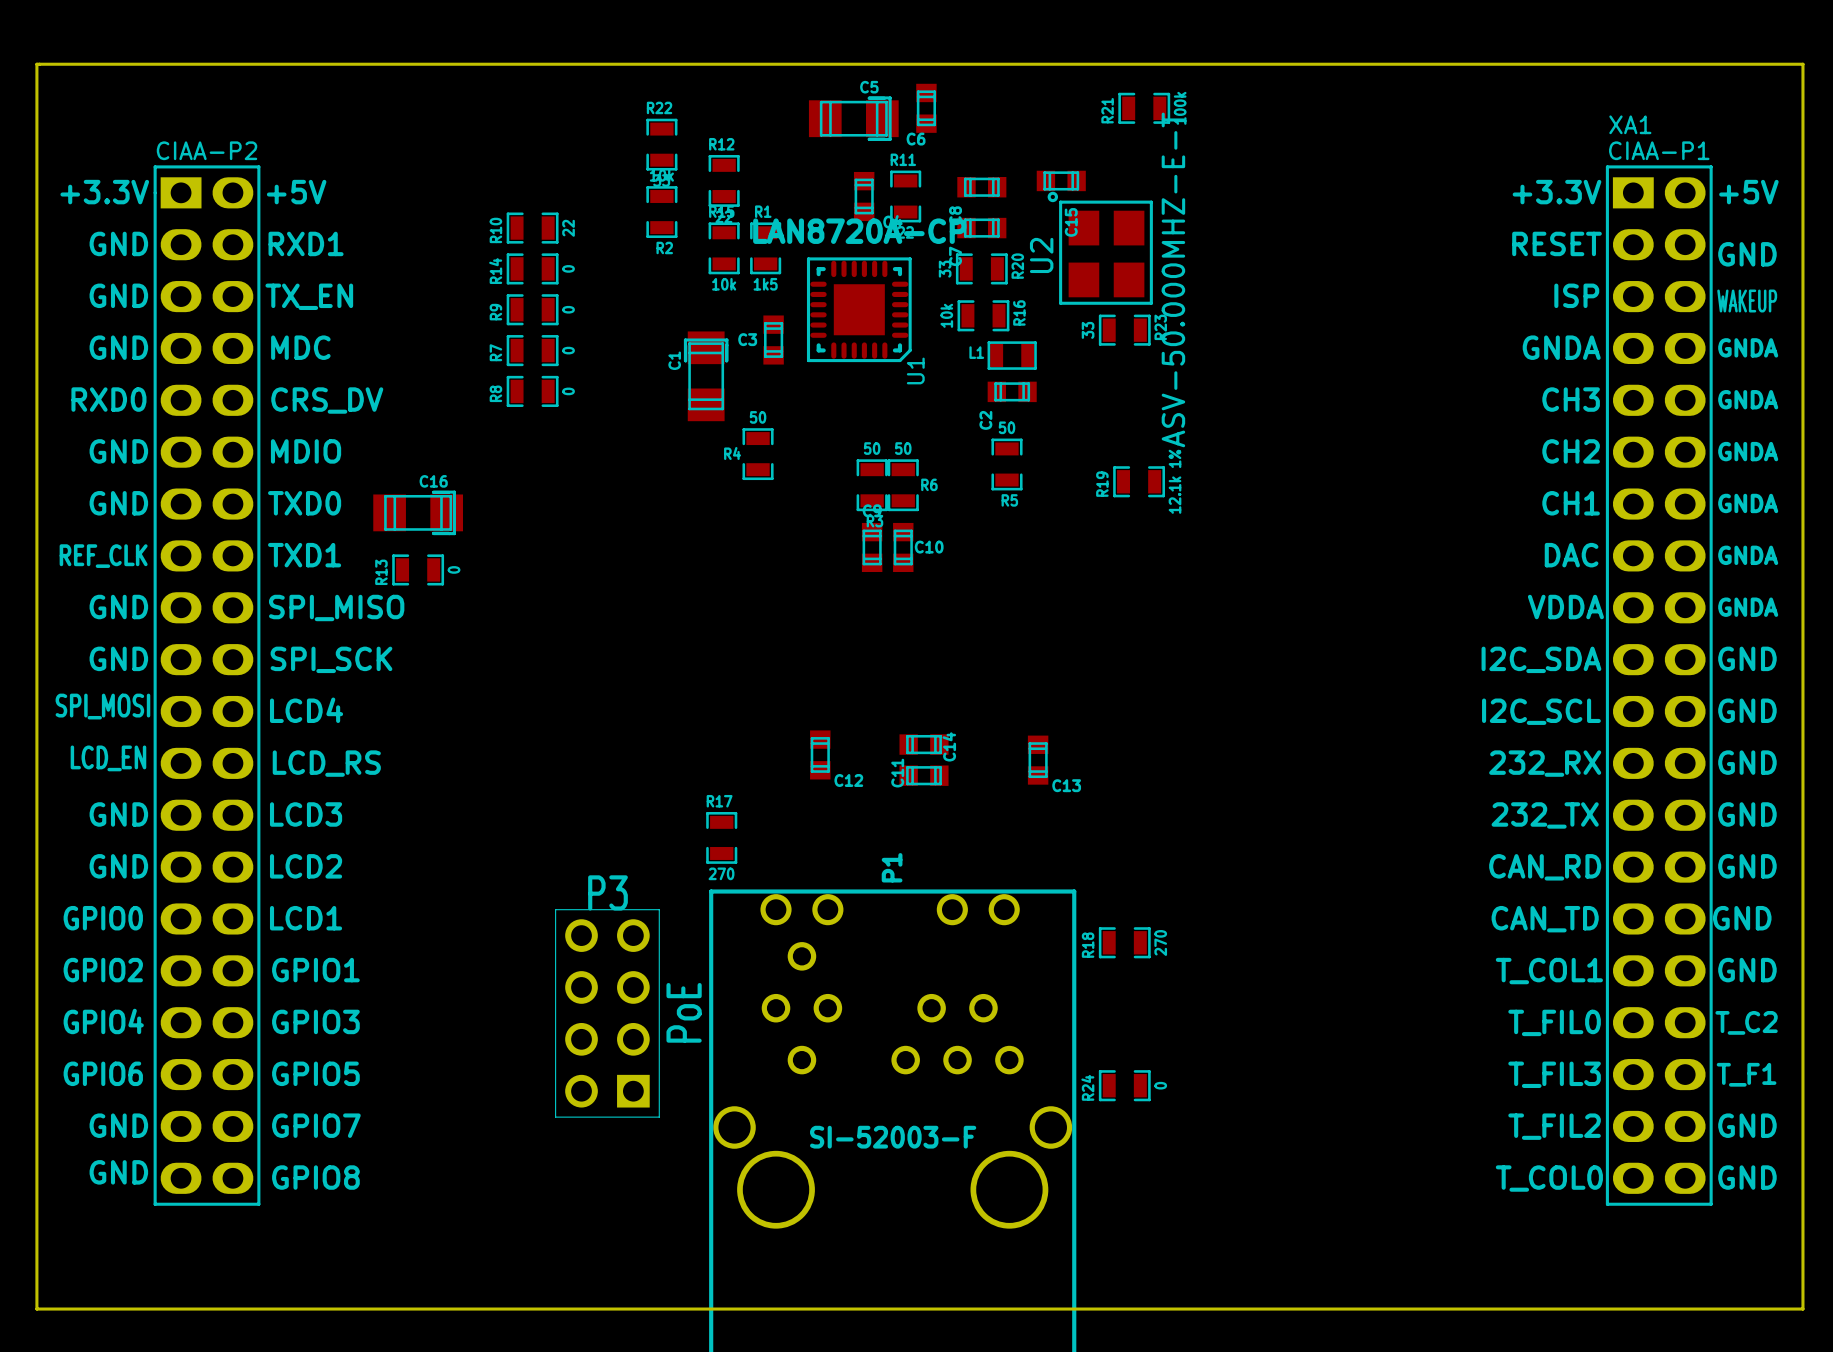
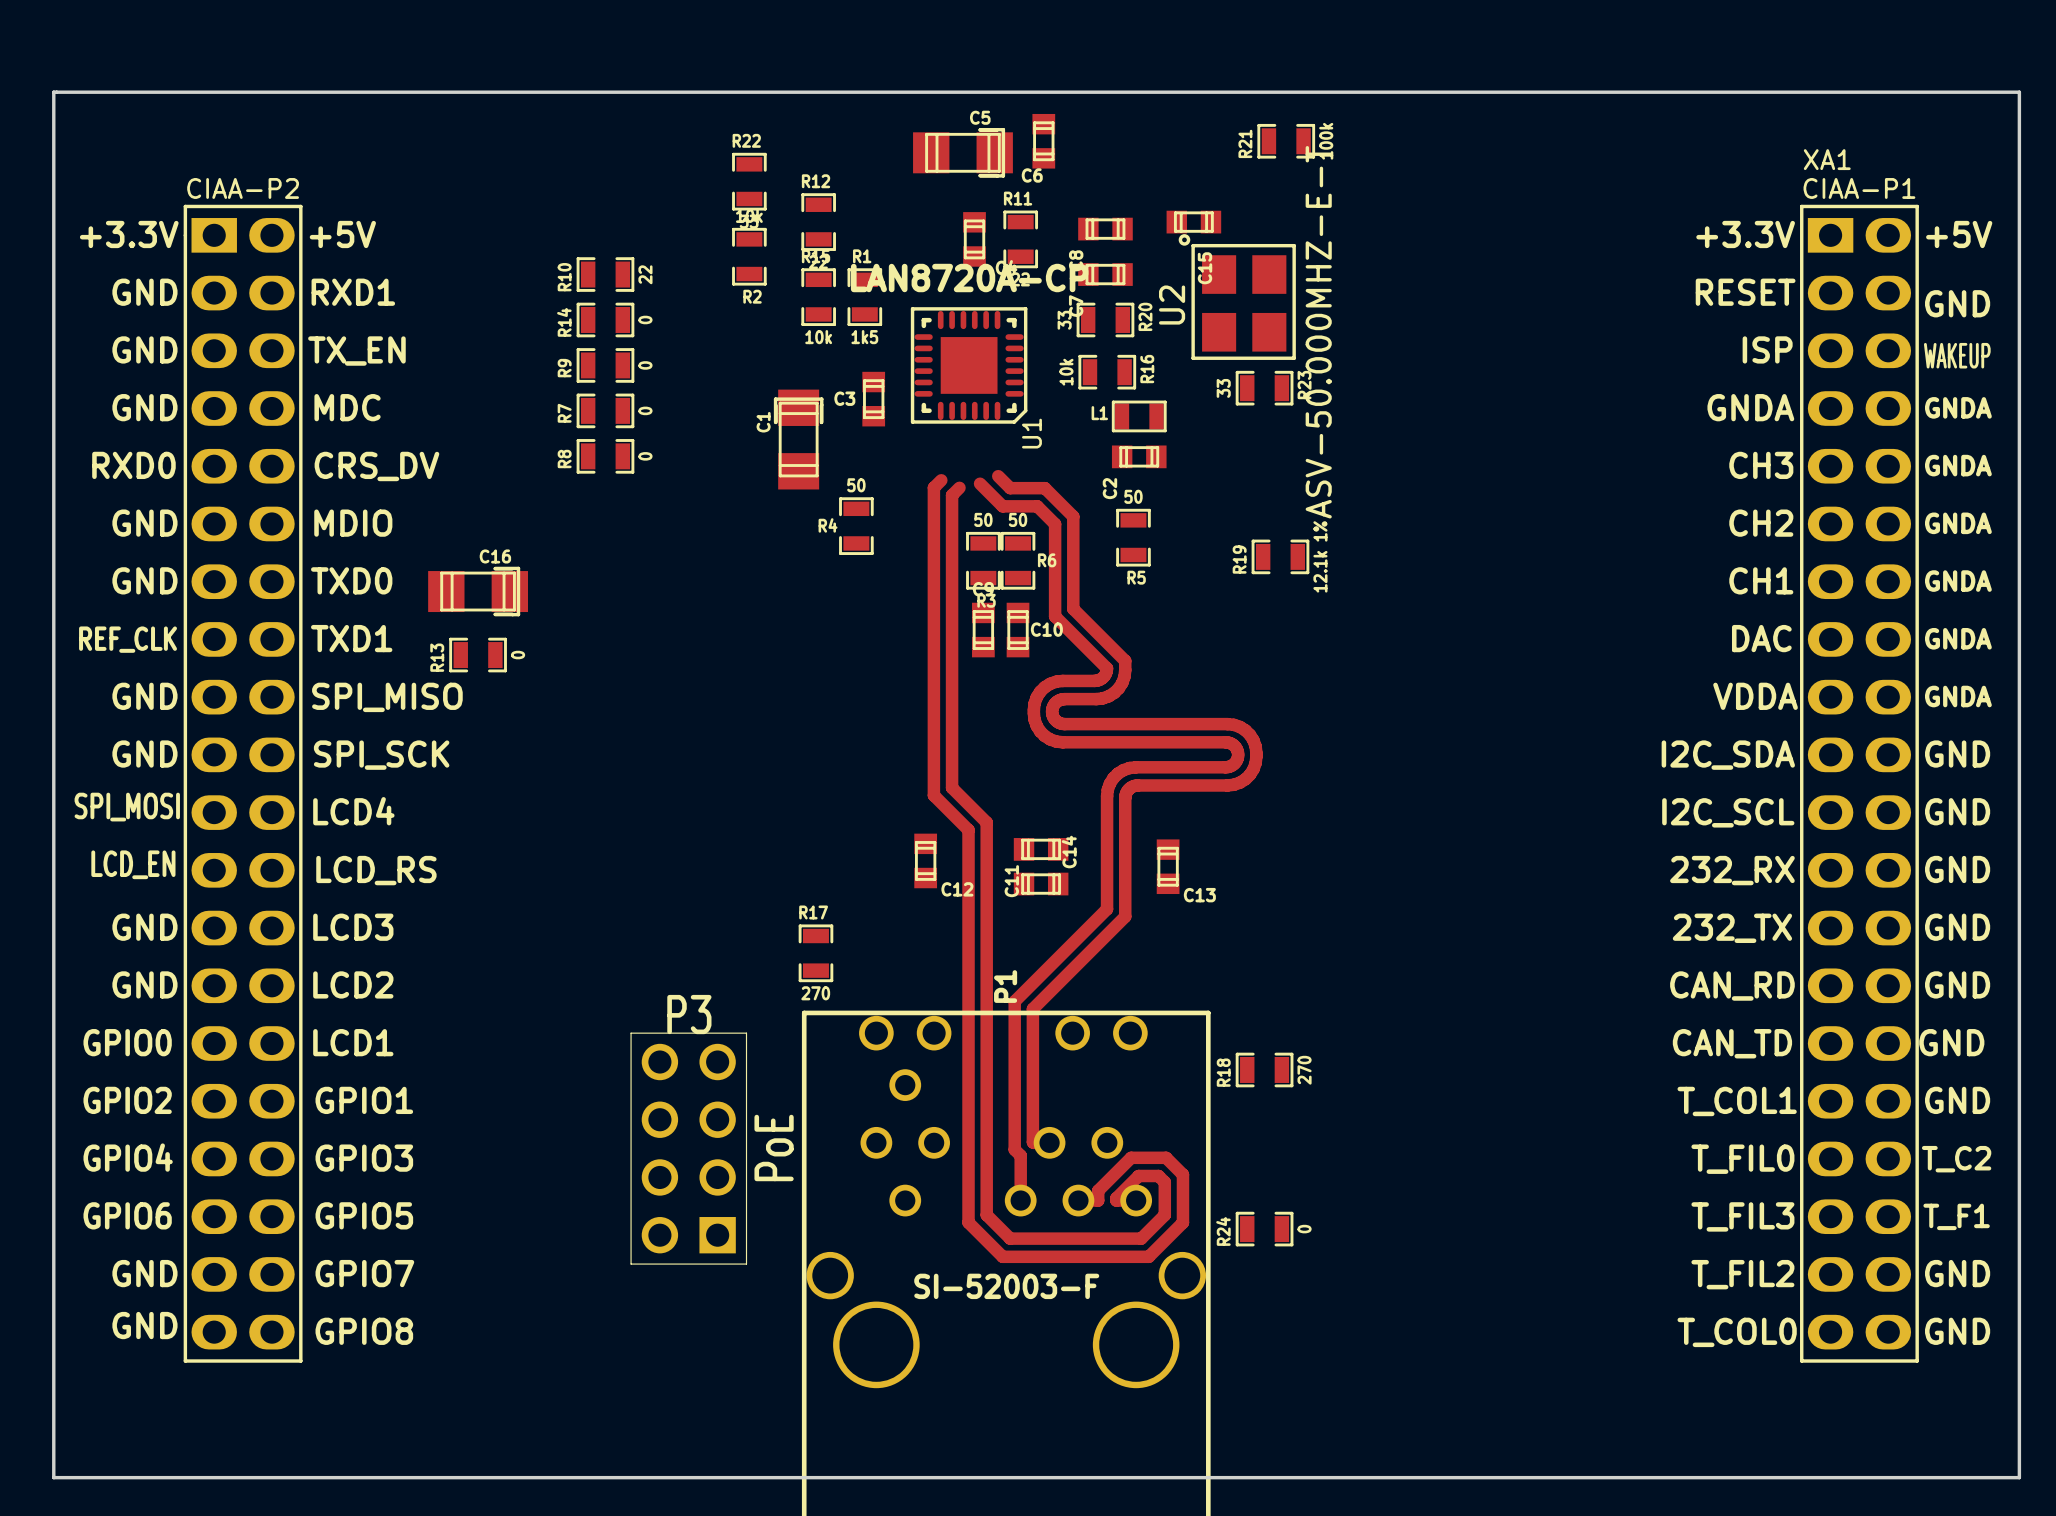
track: none -> (998, 476) (1010, 488) (1044, 488) (1073, 516) (1073, 608) (1125, 660) (1124, 676) (1114, 692) (1102, 698) (1059, 700) (1052, 708) (1054, 719) (1064, 724) (1233, 724) (1250, 735) (1256, 753) (1255, 763) (1250, 774) (1233, 784) (1137, 785) (1129, 788) (1126, 792) (1125, 916) (1032, 1009) (1032, 1142) (1049, 1142)
track: none -> (941, 480) (933, 487) (933, 795) (968, 830) (968, 1222) (1002, 1256) (1148, 1256) (1182, 1222) (1182, 1174) (1166, 1157) (1131, 1157) (1098, 1190) (1098, 1200) (1078, 1200)
track: none -> (980, 483) (1002, 506) (1037, 506) (1055, 524) (1055, 616) (1107, 668) (1104, 676) (1097, 680) (1056, 681) (1044, 687) (1036, 697) (1033, 709) (1034, 719) (1040, 731) (1050, 739) (1062, 742) (1228, 742) (1235, 747) (1238, 754) (1235, 762) (1228, 766) (1129, 768) (1117, 773) (1109, 783) (1107, 796) (1107, 909) (1014, 1001) (1014, 1149) (1020, 1155) (1020, 1200)
track: none -> (959, 487) (952, 495) (952, 787) (986, 822) (986, 1215) (1010, 1238) (1141, 1238) (1164, 1215) (1164, 1182) (1158, 1175) (1138, 1175) (1116, 1198) (1116, 1200) (1136, 1200)

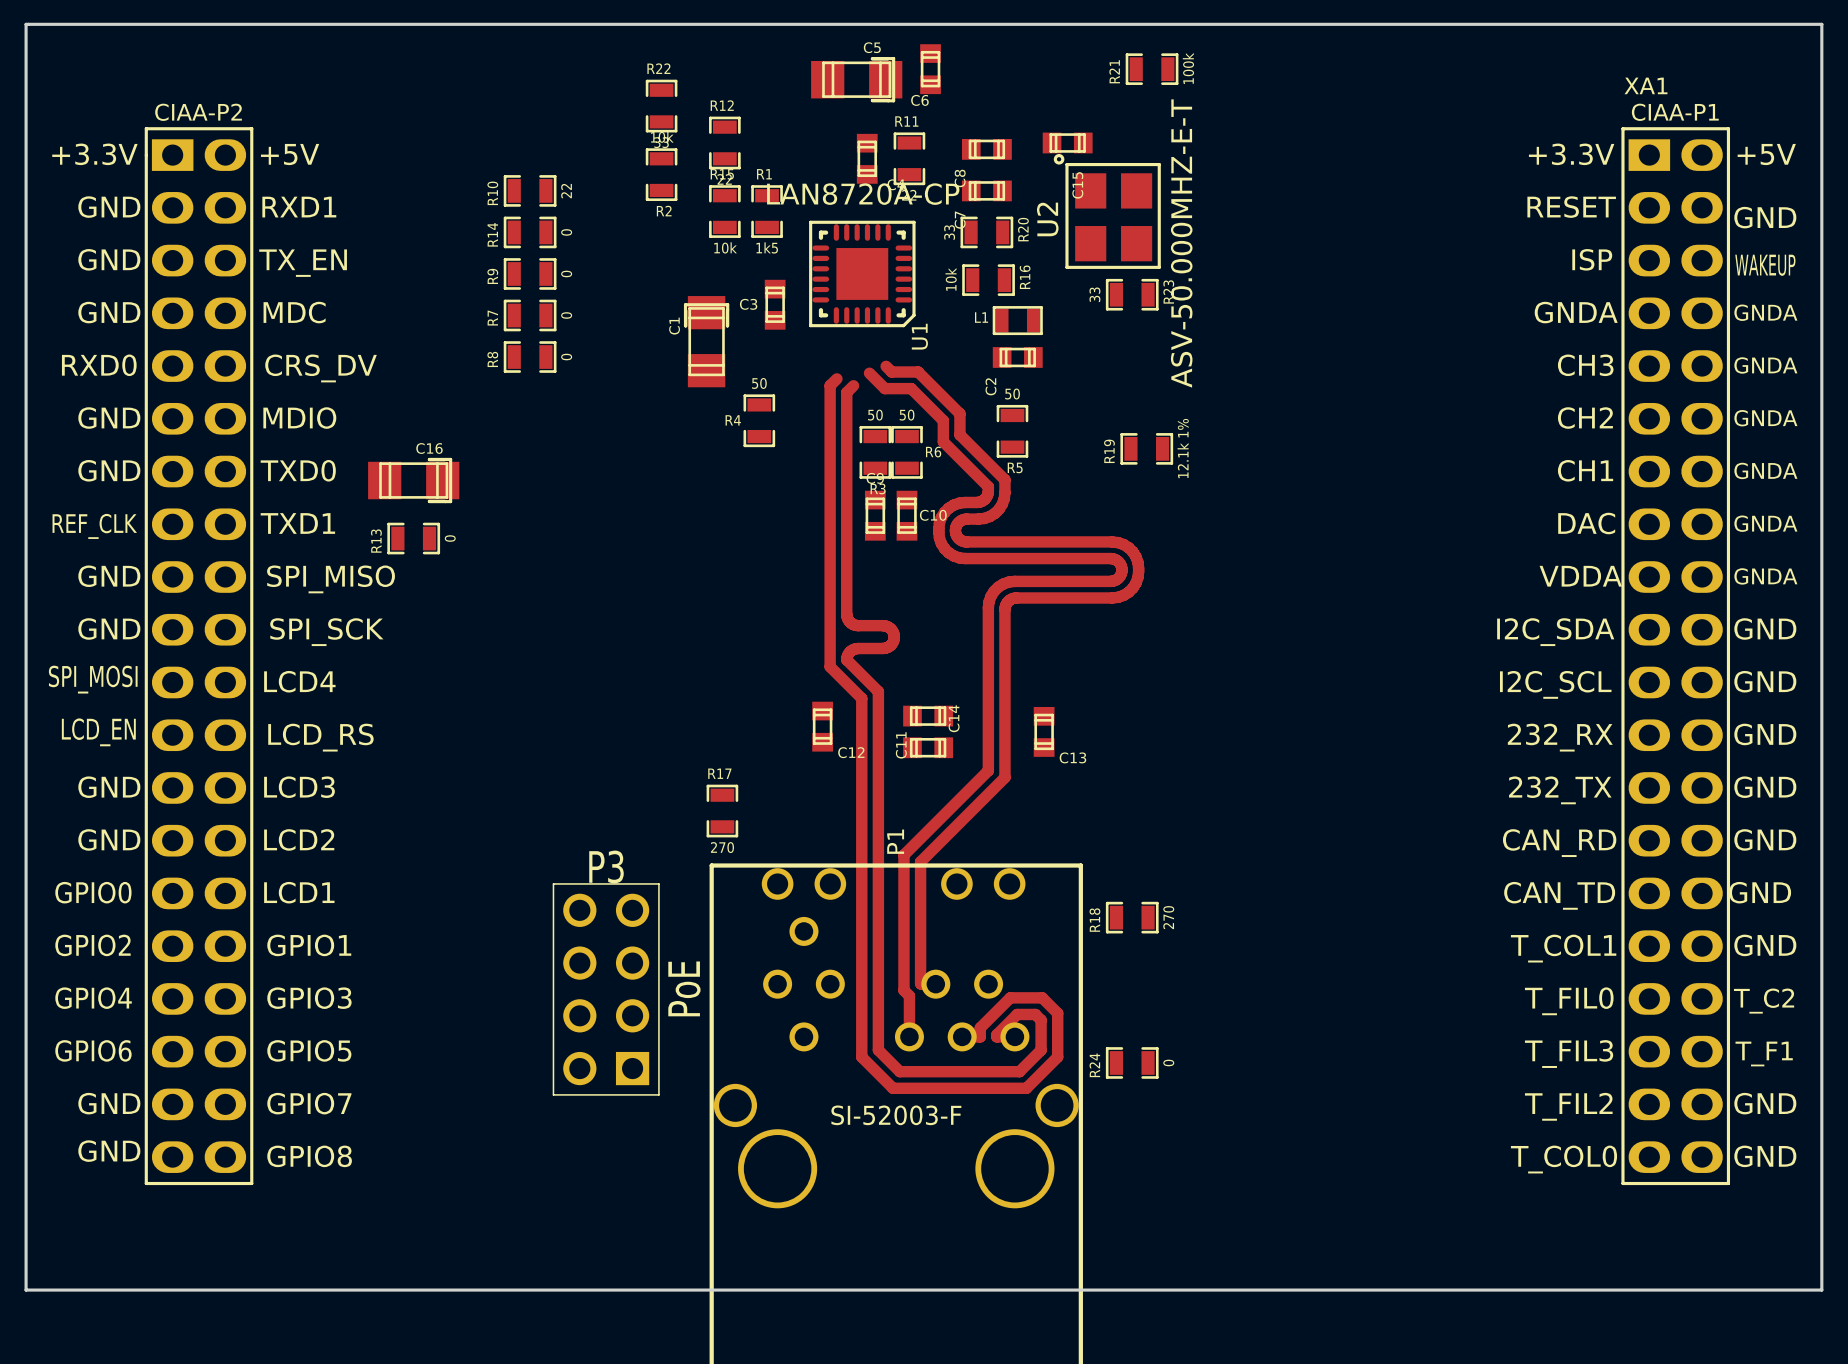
track: (998, 476) (1010, 488) (1044, 488) (1073, 516) (1073, 608) (1125, 660) (1124, 676) (1114, 692) (1102, 698) (1059, 700) (1052, 708) (1054, 719) (1064, 724) (1227, 724) (1240, 726) (1253, 740) (1256, 753) (1255, 763) (1250, 774) (1240, 782) (1227, 785) (1134, 785) (1127, 790) (1125, 797) -> (886, 366) (891, 372) (918, 372) (959, 413) (959, 434) (1004, 479) (1004, 498) (999, 509) (984, 518) (964, 519) (959, 521) (955, 530) (959, 539) (966, 541) (1112, 541) (1123, 544) (1136, 556) (1138, 568) (1136, 583) (1128, 592) (1118, 597) (1016, 598) (1009, 600) (1004, 609) (1004, 669)
track: (980, 483) (1002, 506) (1037, 506) (1055, 524) (1055, 616) (1107, 668) (1104, 676) (1097, 680) (1056, 681) (1044, 687) (1036, 697) (1033, 709) (1034, 719) (1040, 731) (1050, 739) (1062, 742) (1225, 742) (1233, 745) (1237, 752) (1235, 762) (1228, 766) (1129, 768) (1113, 778) (1107, 796) -> (869, 373) (884, 388) (911, 388) (943, 420) (943, 441) (988, 486) (988, 493) (984, 500) (953, 505) (941, 517) (938, 528) (939, 538) (948, 552) (965, 558) (1110, 558) (1117, 561) (1120, 565) (1120, 574) (1113, 581) (1014, 581) (998, 587) (989, 601) (988, 667)
track: (952, 737) (952, 787) -> (846, 614) (849, 621) (855, 625) (887, 626) (891, 629) (894, 637) (891, 644) (885, 648) (853, 649) (849, 652) (846, 659)

